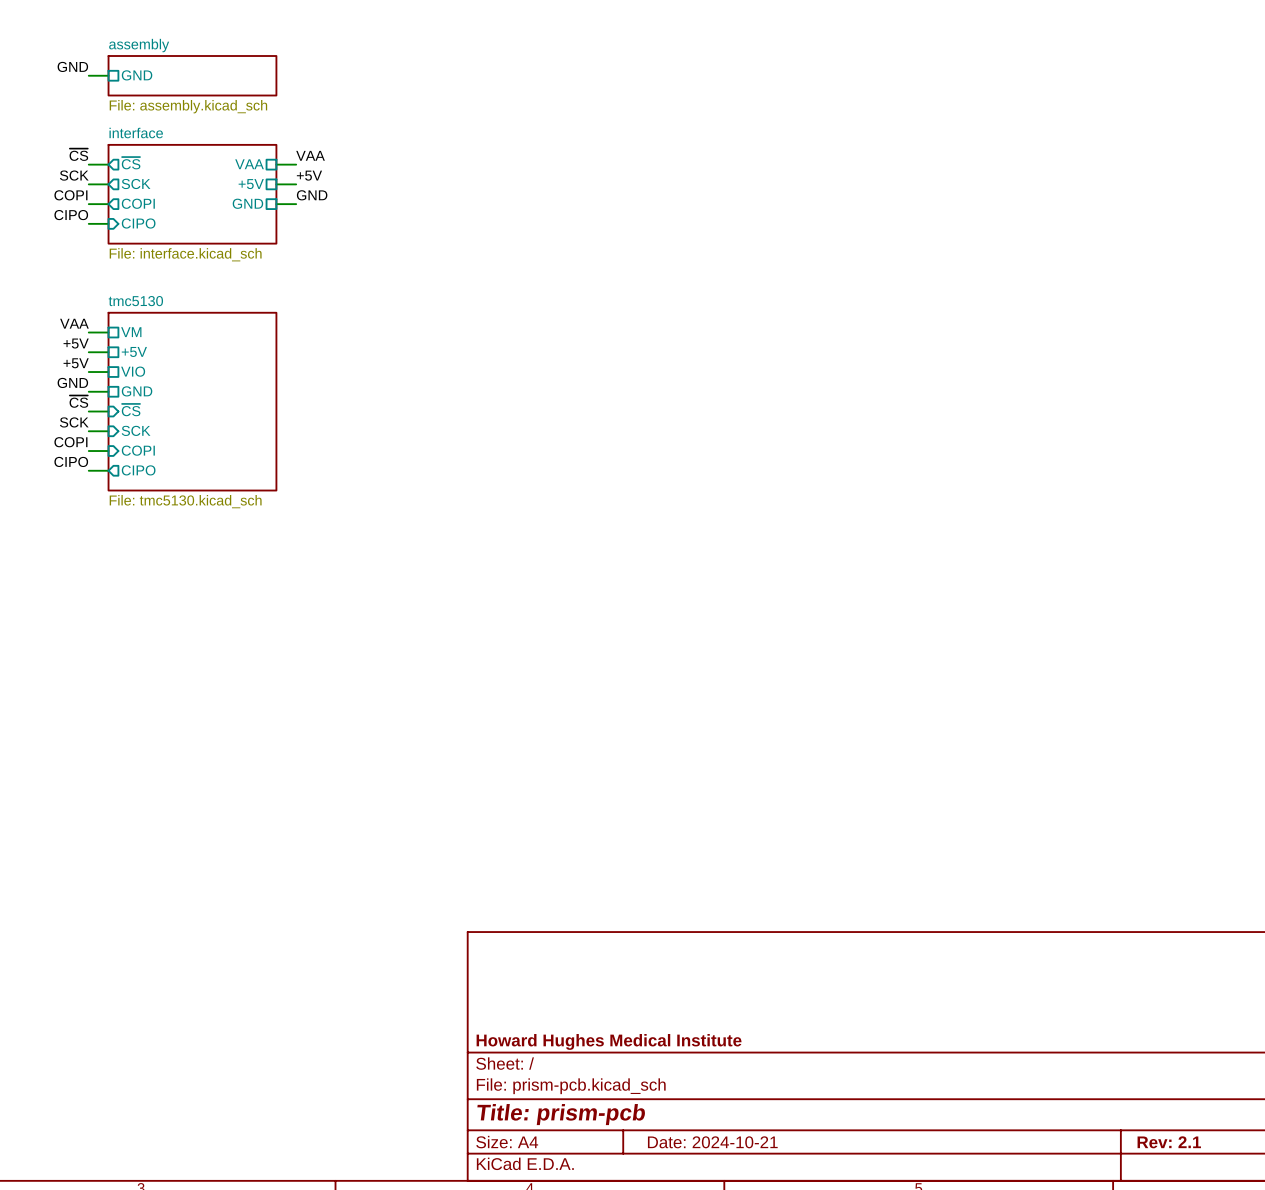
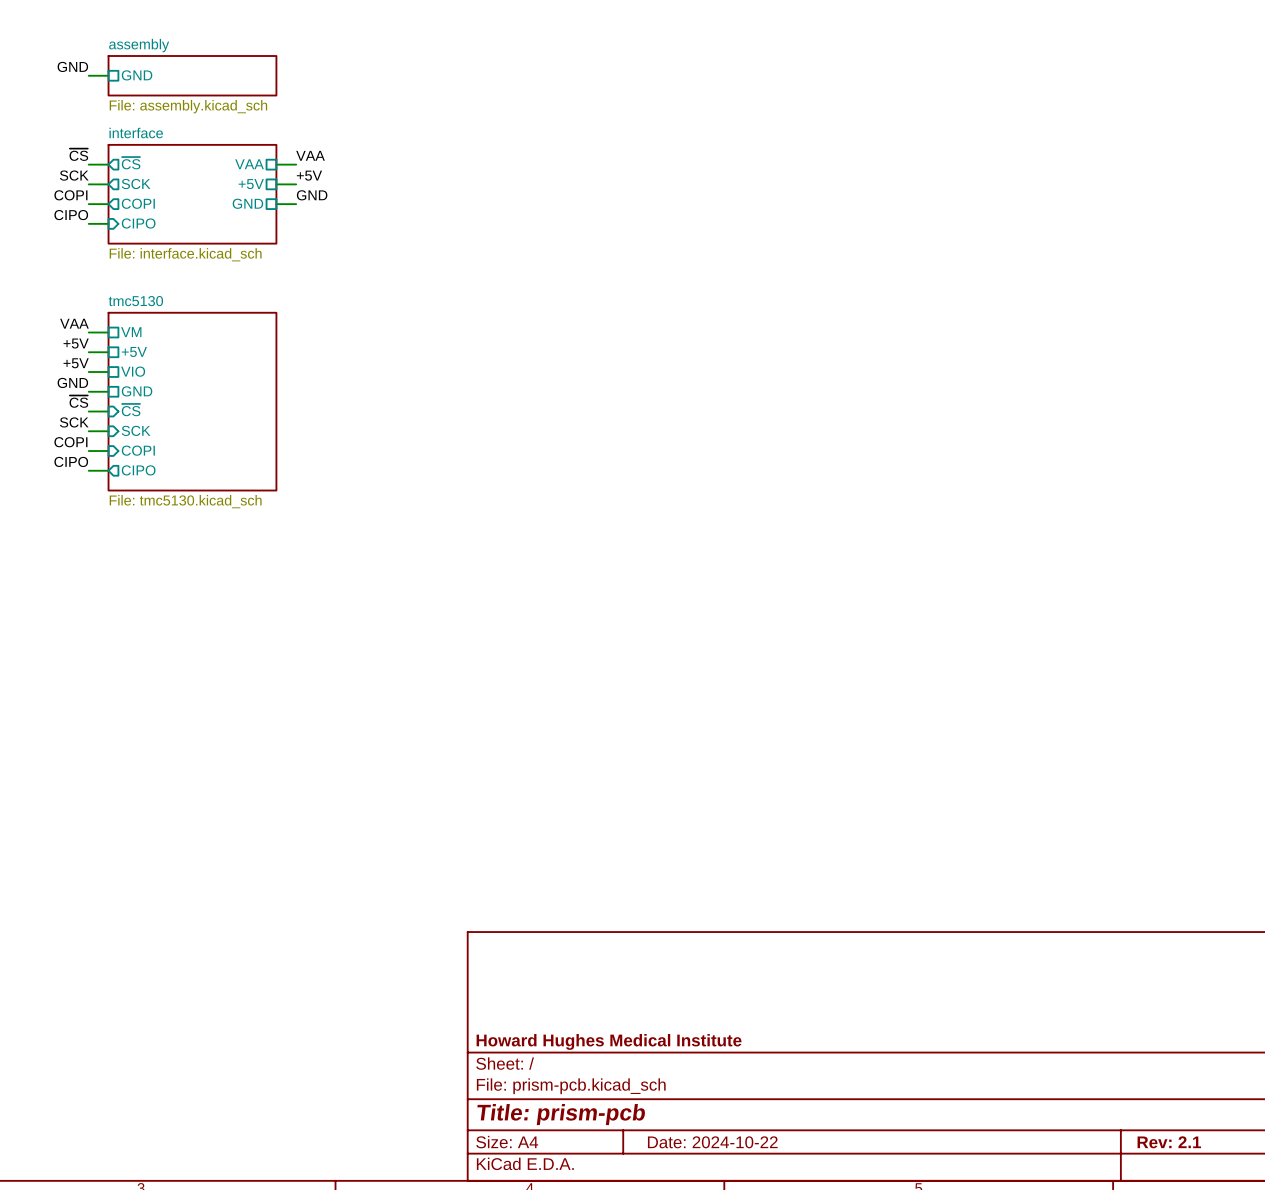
title block: Date: 2024-10-21 (712, 1142) -> Date: 2024-10-22 (712, 1142)

